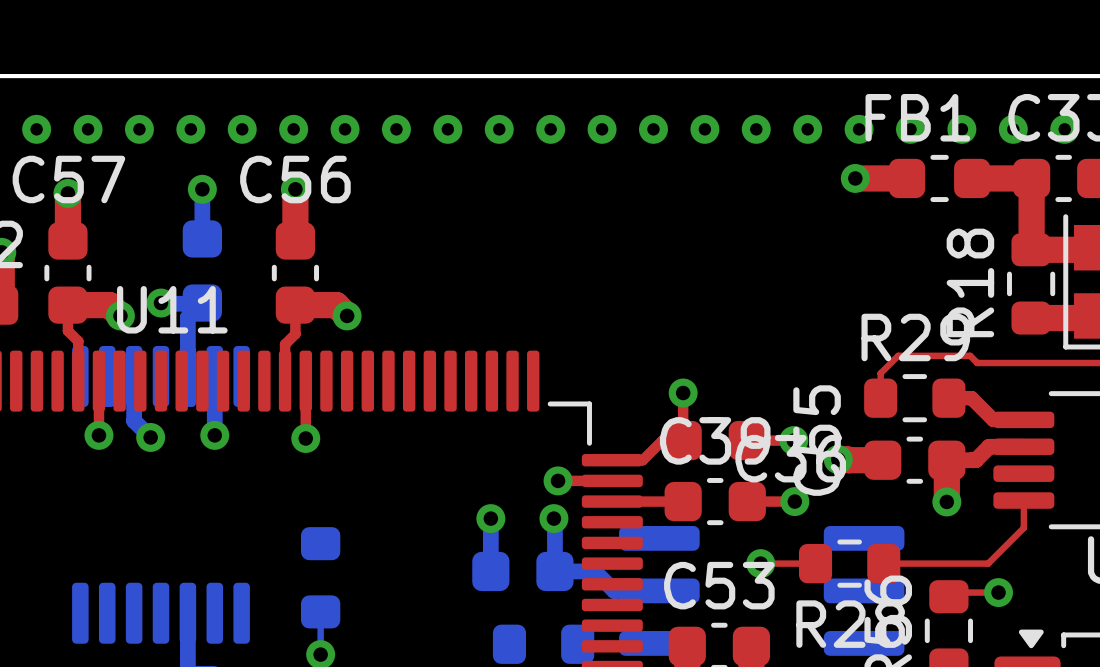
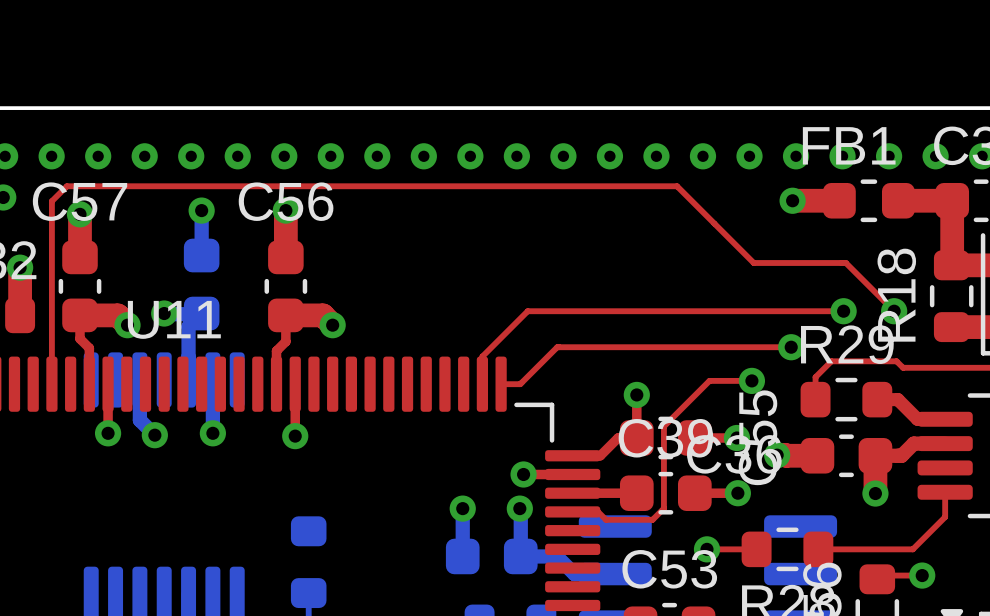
top track: none -> (843, 311) (527, 311) (482, 356) (482, 384)
via: none -> (843, 311)
top track: none -> (894, 311) (845, 262) (753, 262) (677, 186) (66, 186) (51, 201) (51, 384)
via: none -> (894, 311)
top track: none -> (791, 347) (557, 347) (520, 384) (501, 384)
via: none -> (791, 347)
top track: none -> (751, 380) (709, 380) (663, 426) (663, 508) (652, 519) (606, 519) (598, 511) (572, 511)
via: none -> (751, 380)

